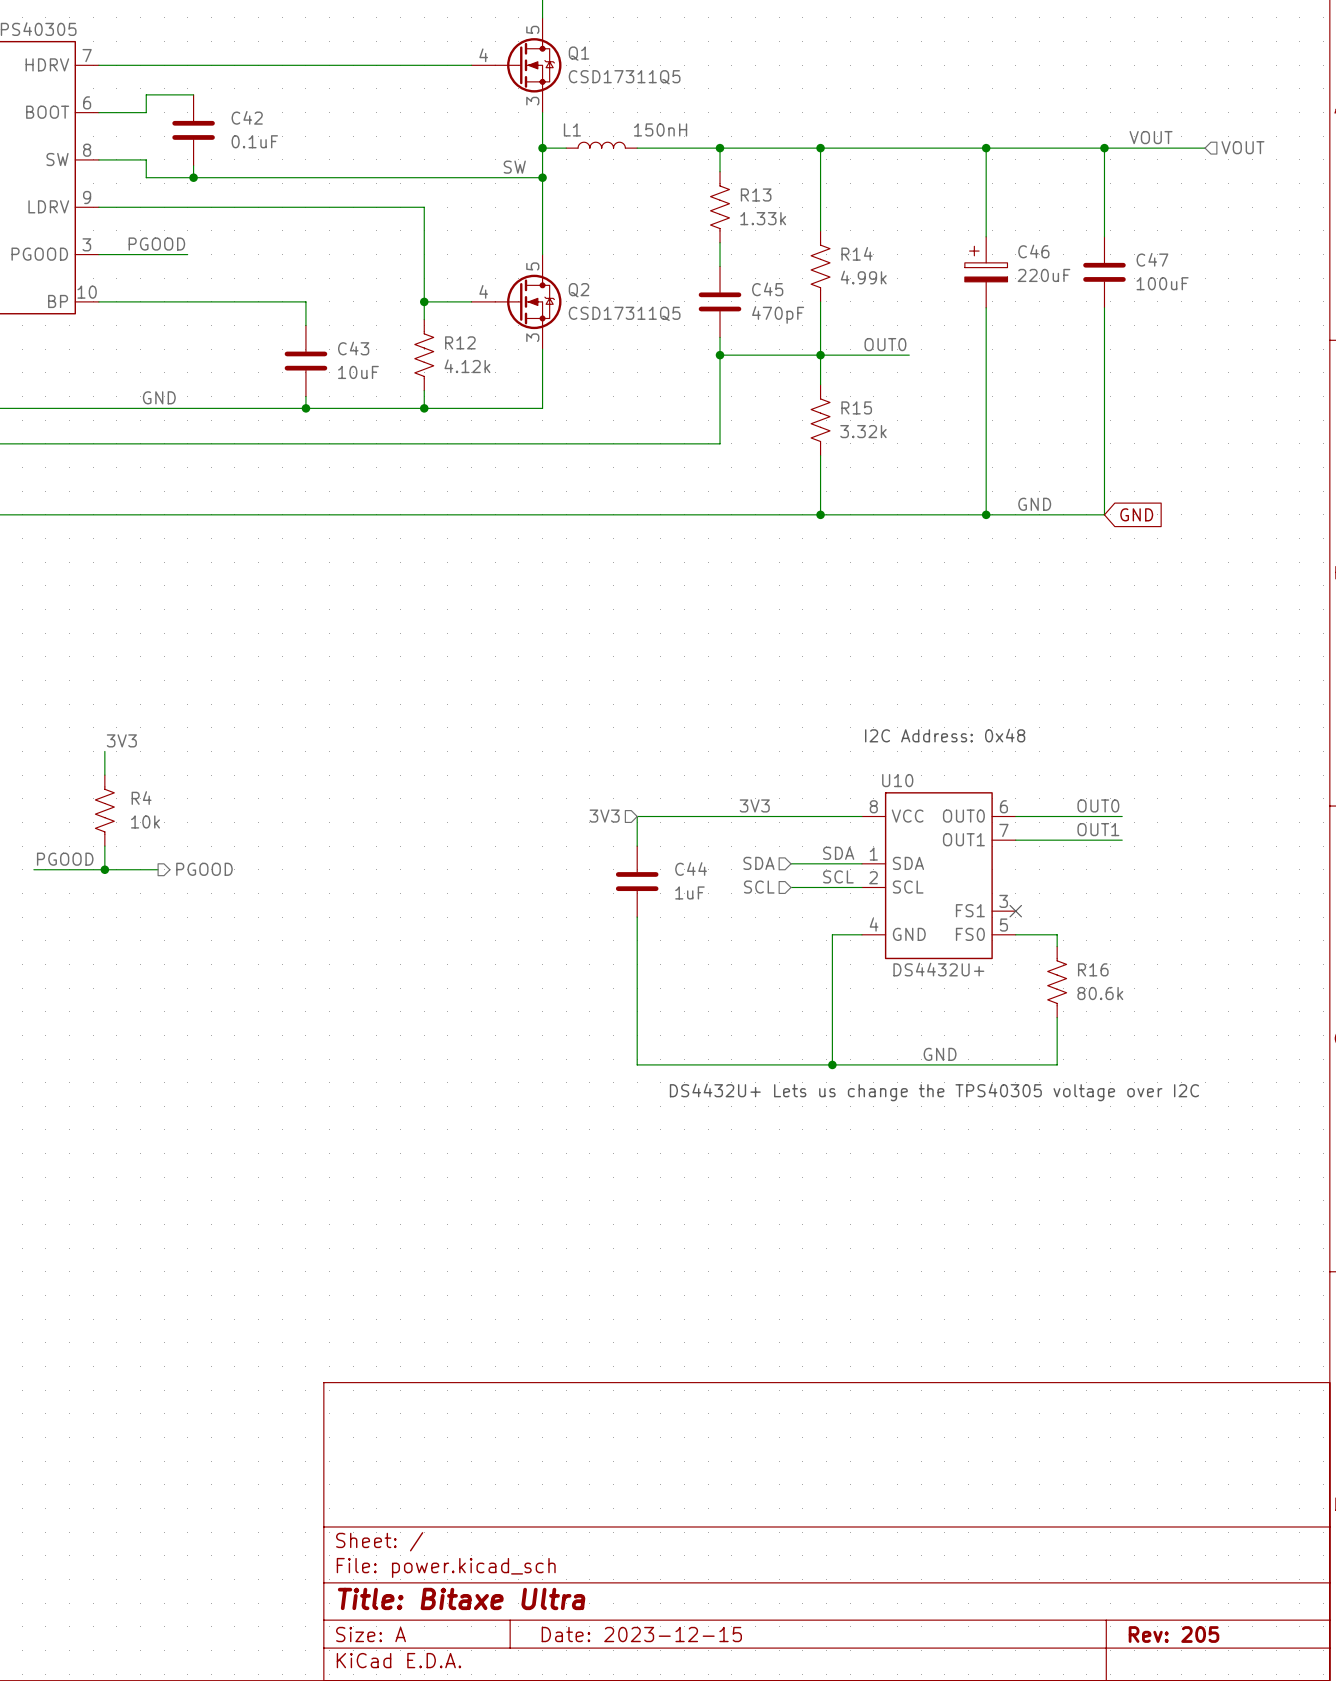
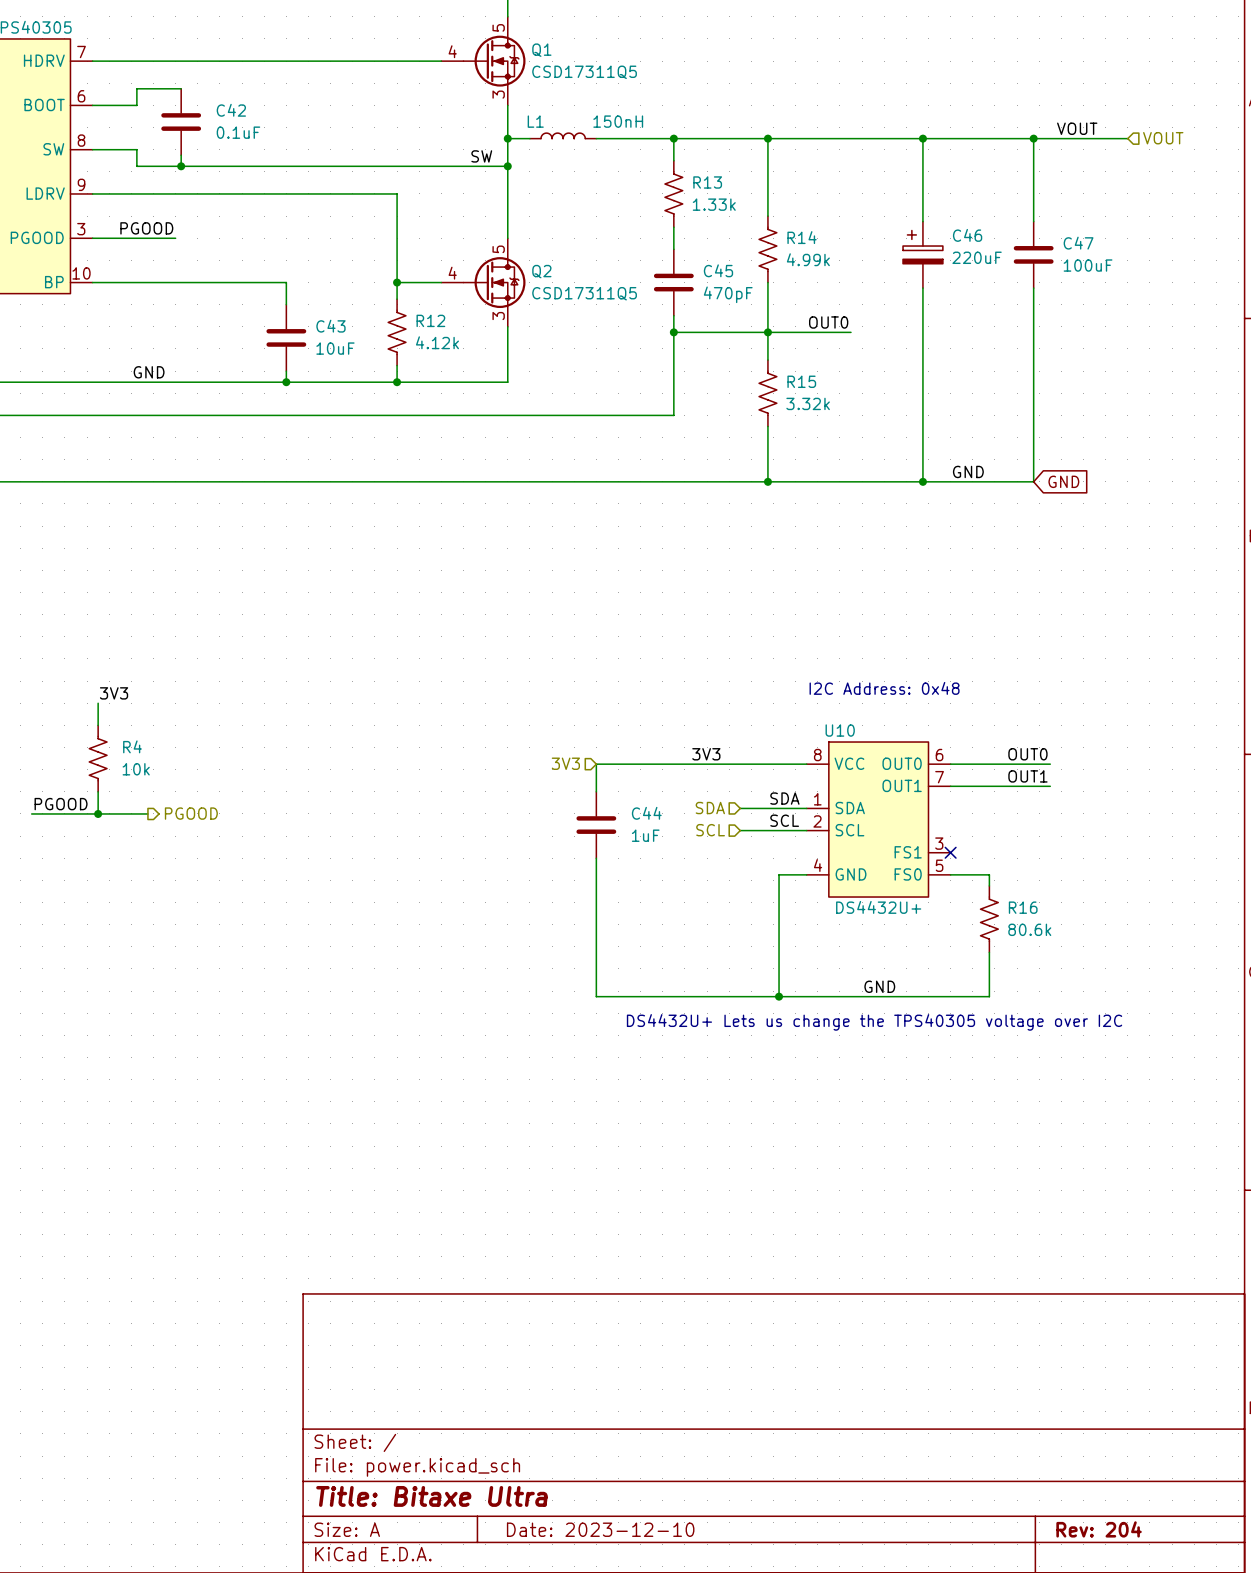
title block: Date: 2023-12-15 (641, 1634) -> Date: 2023-12-10 (600, 1529)
title block: Rev: 205 (1174, 1634) -> Rev: 204 (1099, 1529)

